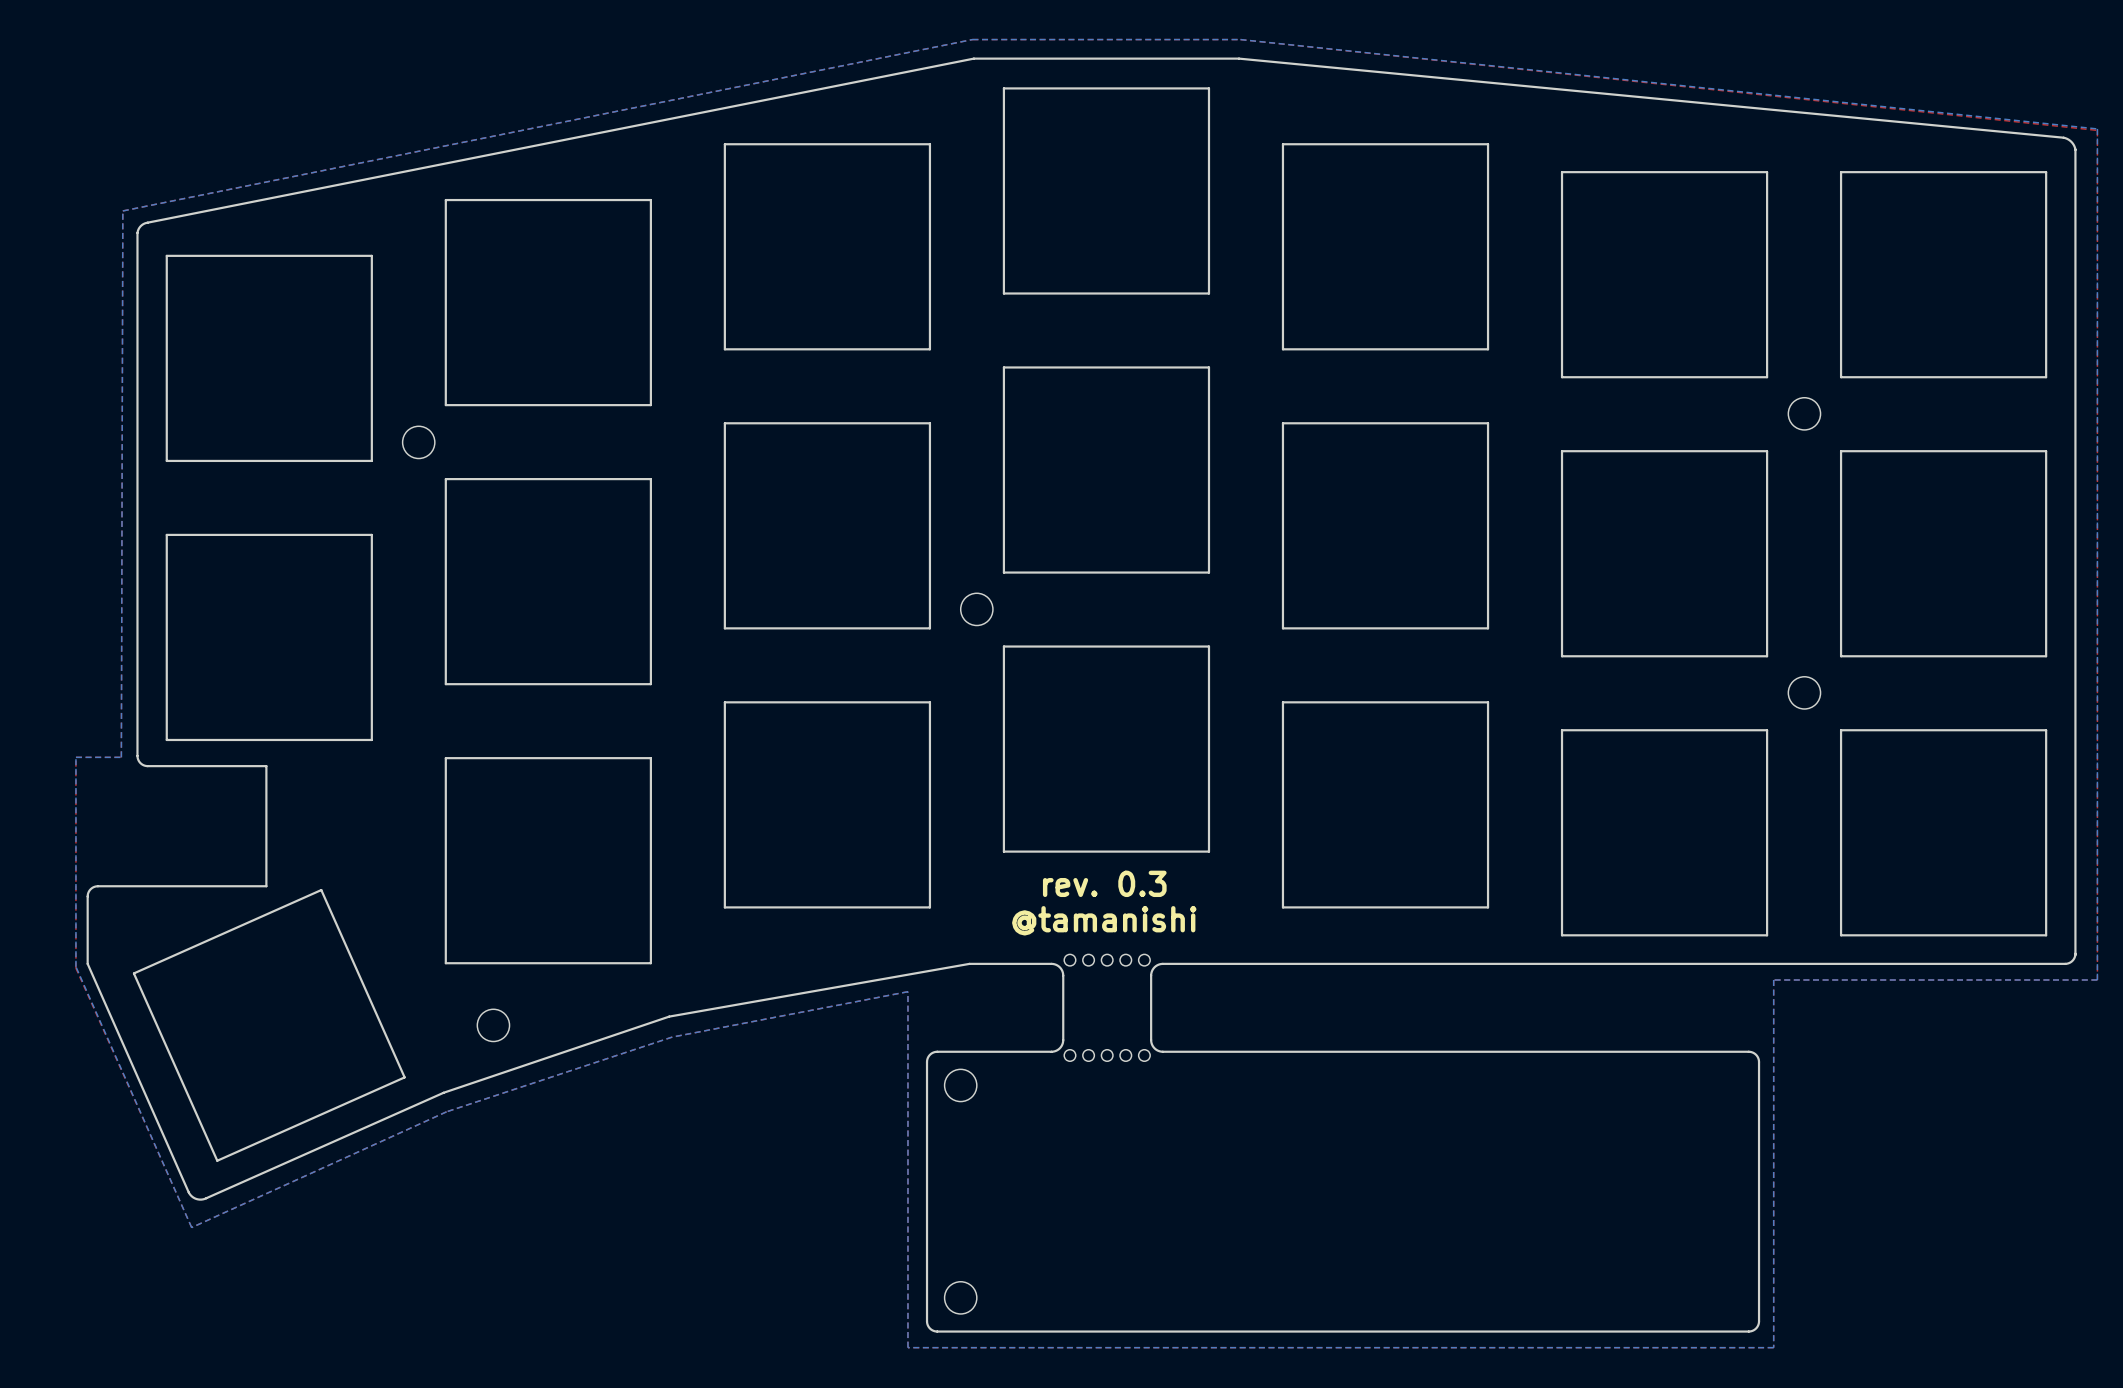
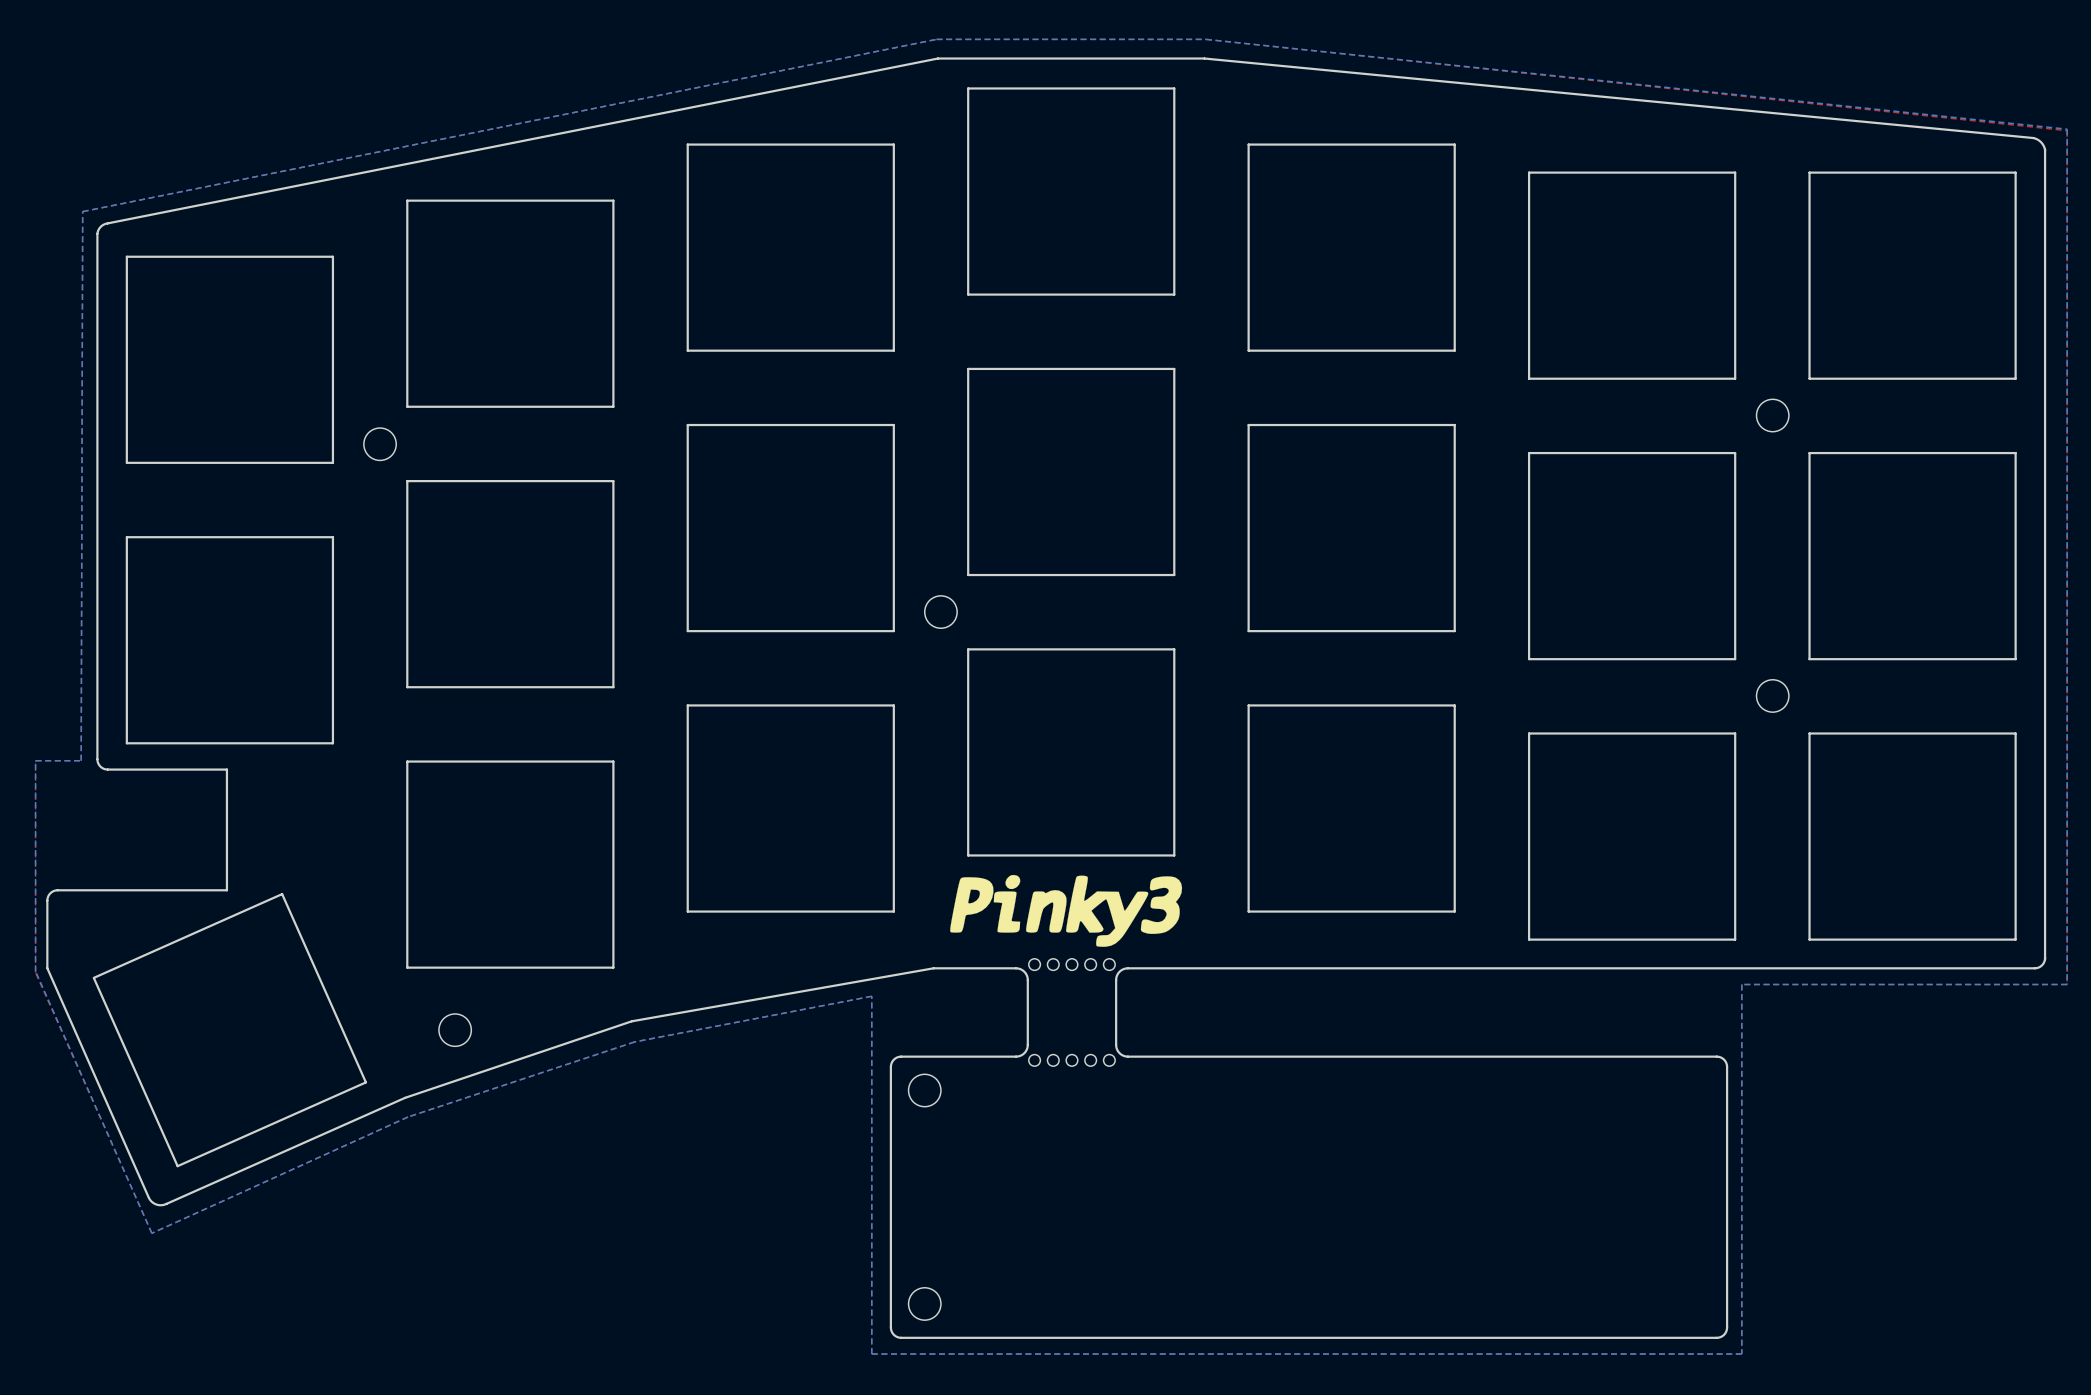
drawing: none -> [950, 874, 1183, 947]
text: rev. 0.3 (1104, 883) -> none
text: @tamanishi (1104, 920) -> none

